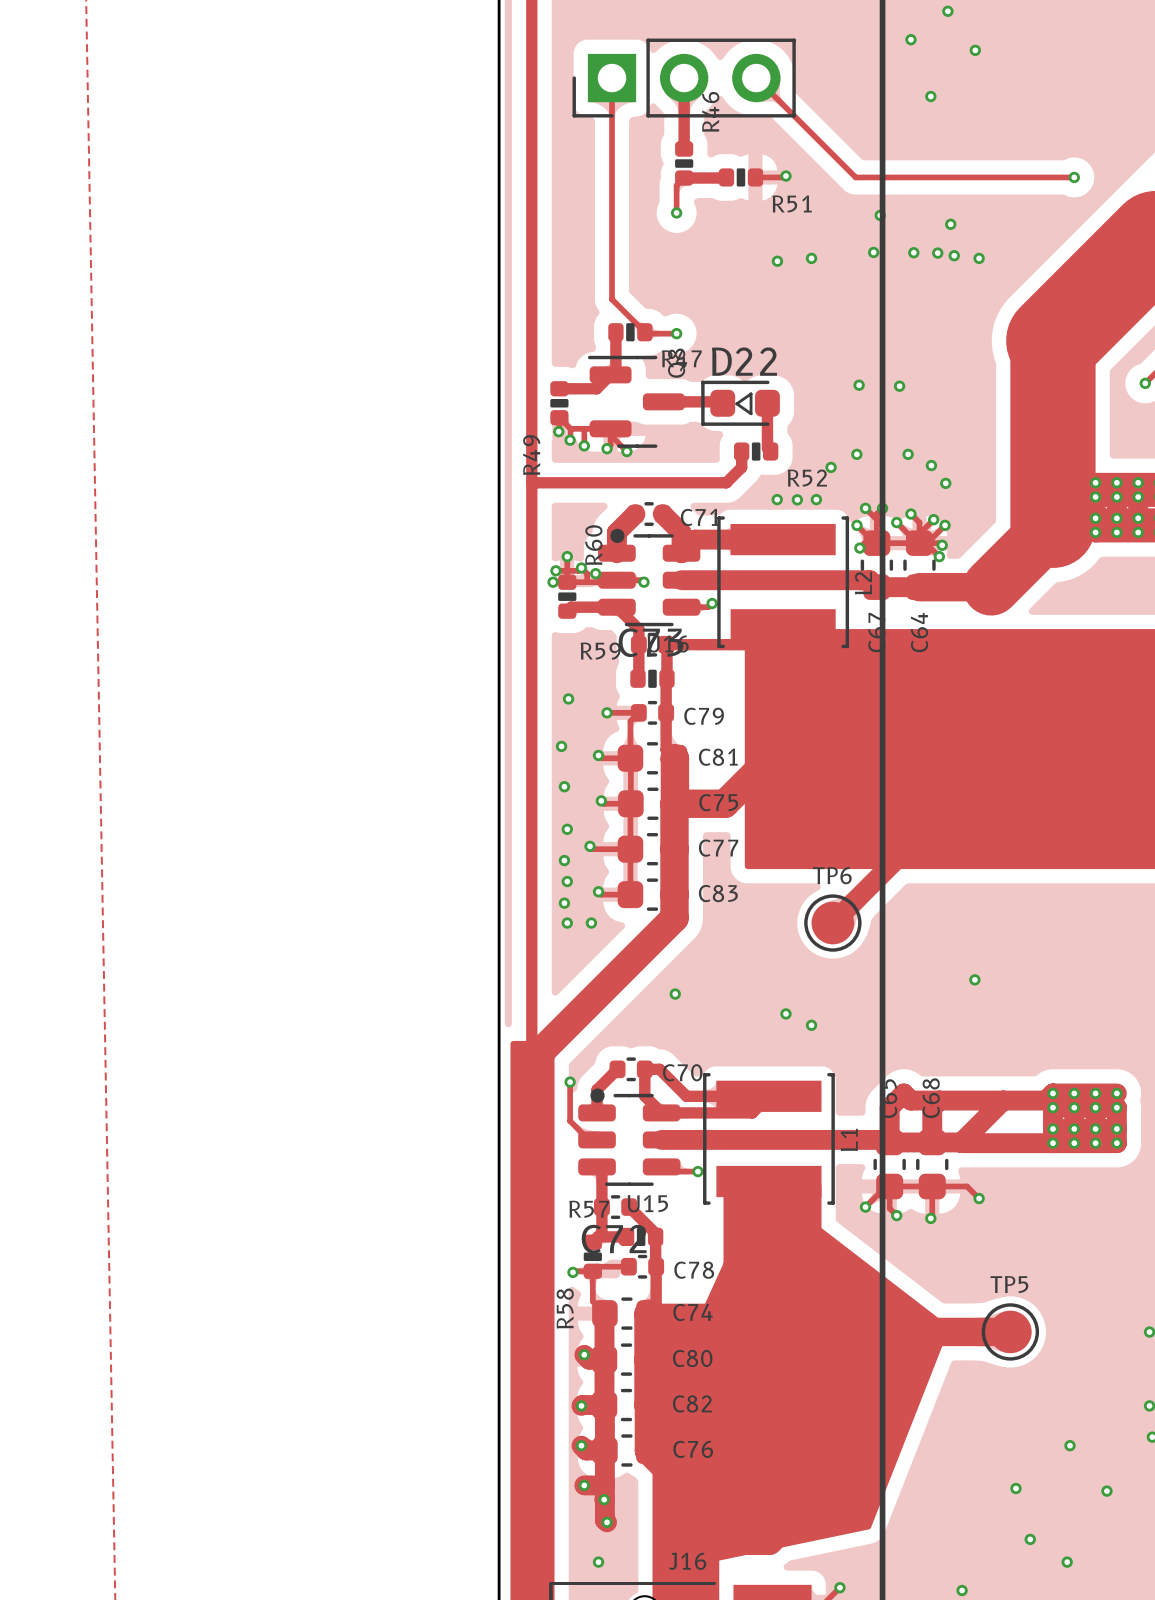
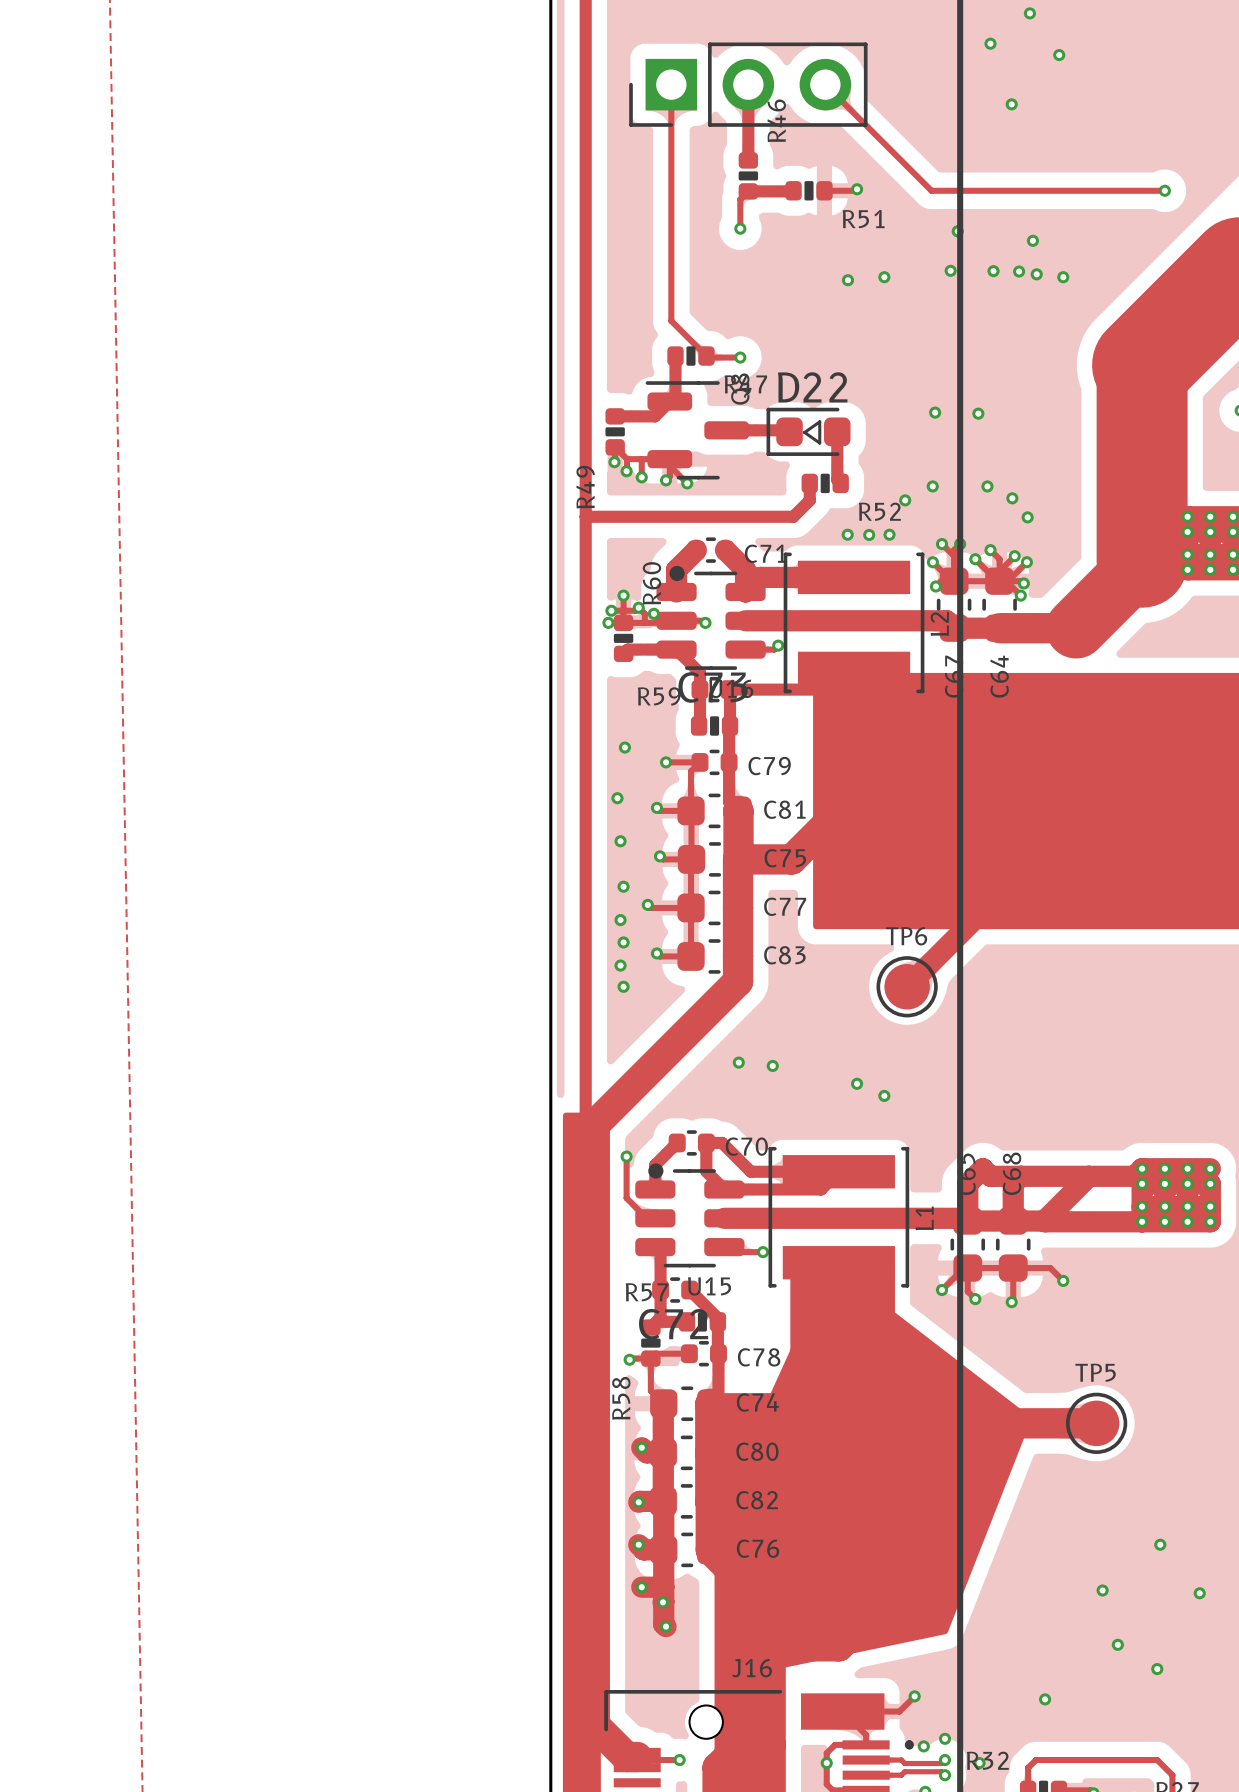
via: (591, 923) -> none
via: (974, 979) -> none
via: none -> (772, 1065)
via: (598, 1562) -> none

